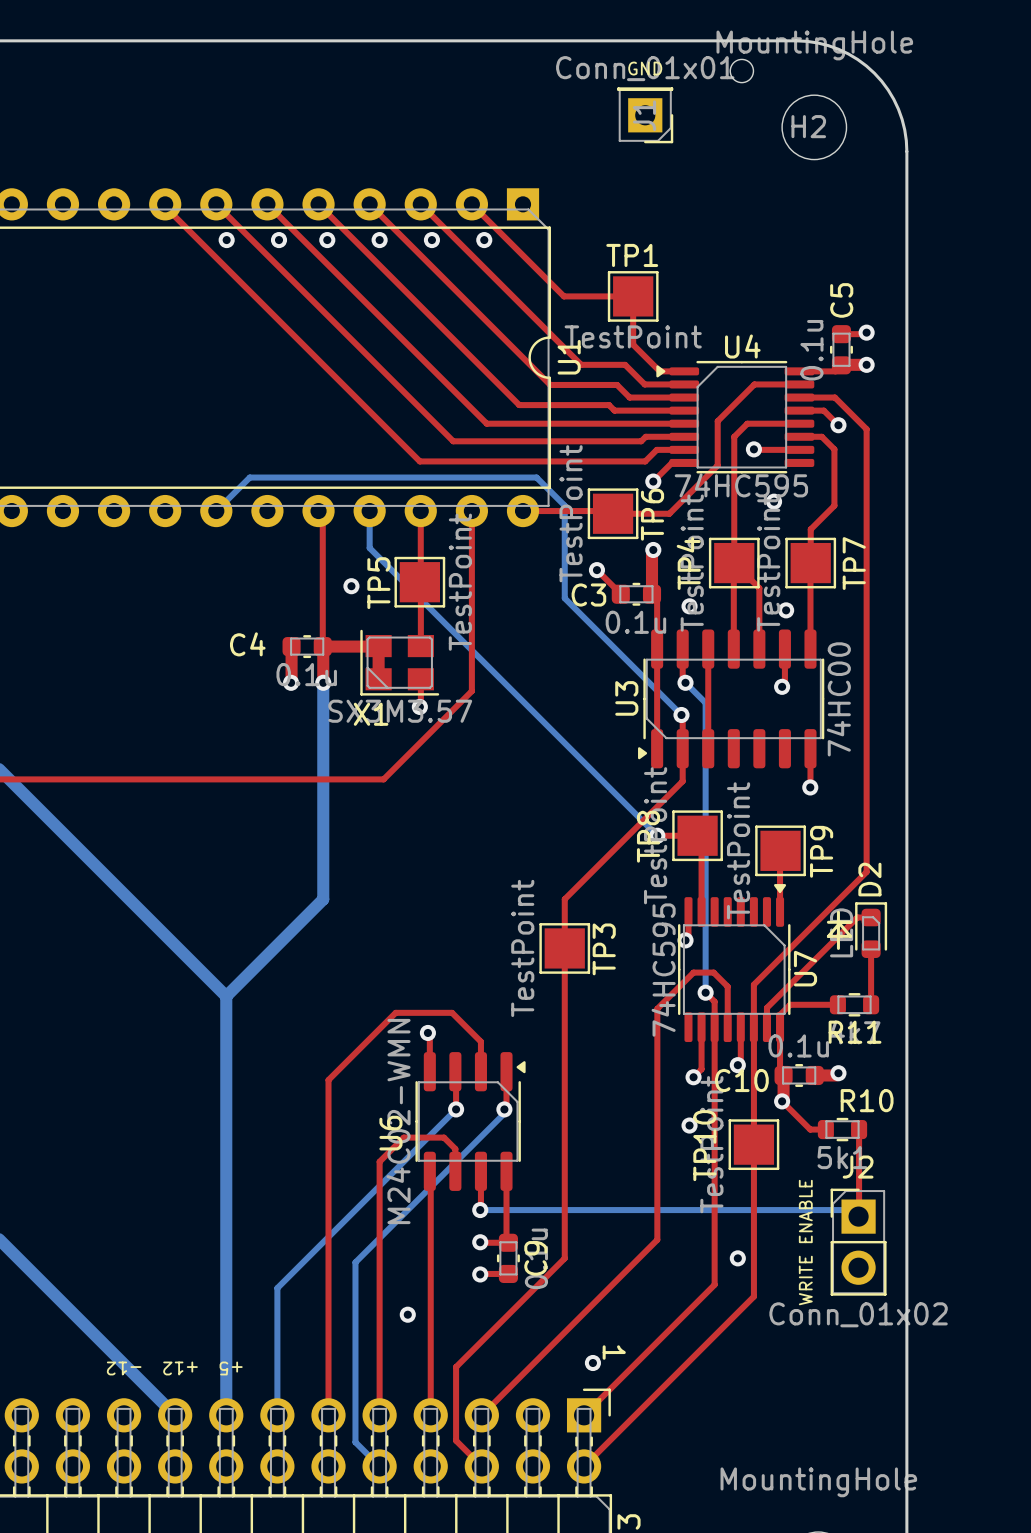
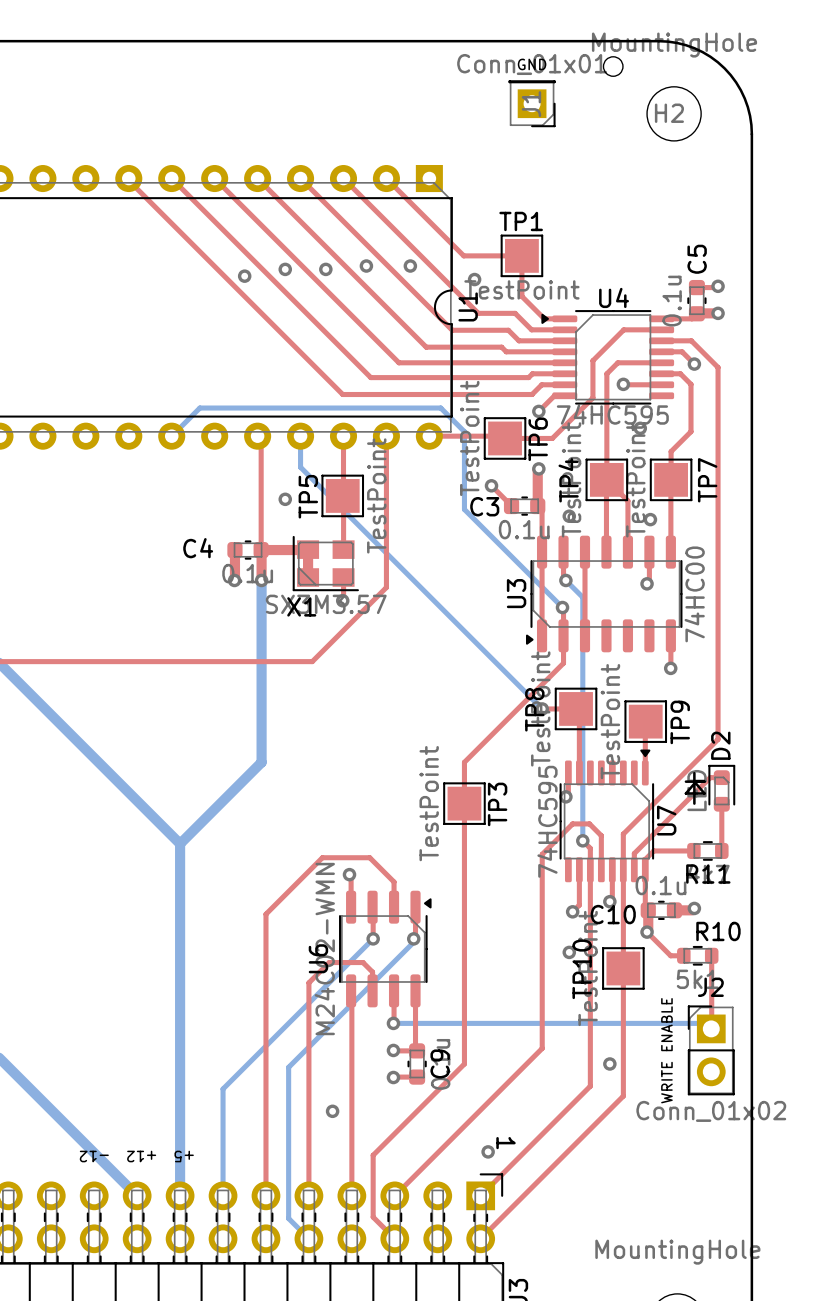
via: (226, 240) -> none
via: (279, 240) -> none
via: (327, 240) -> none
via: (379, 240) -> none
via: (431, 240) -> none
via: (484, 240) -> none
via: none -> (366, 266)
via: none -> (410, 266)
via: none -> (285, 269)
via: none -> (325, 269)
via: none -> (244, 276)
via: none -> (474, 279)

